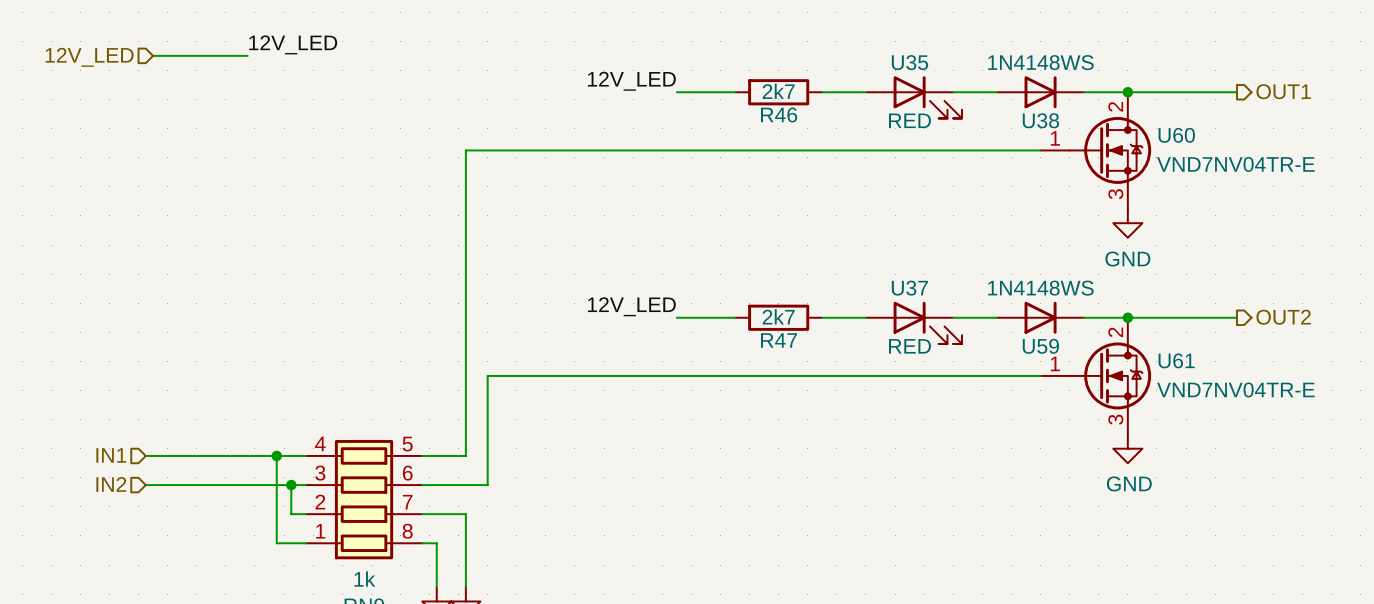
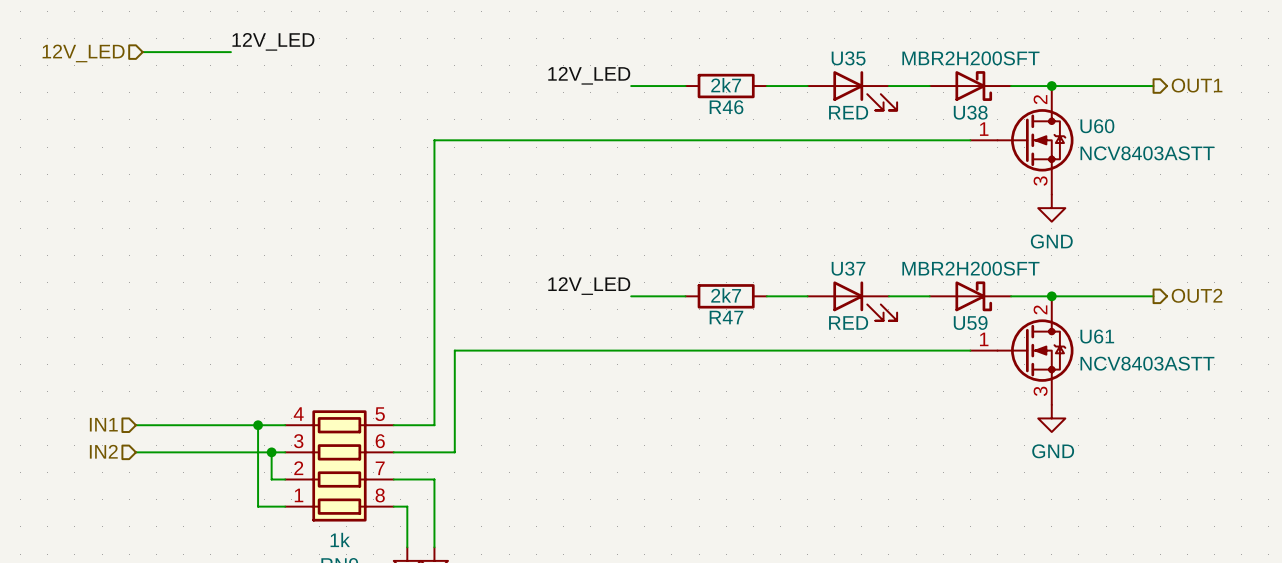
U38 value: 1N4148WS (1040, 62) -> MBR2H200SFT (970, 58)
U38 symbol: [996, 76, 1085, 109] -> [929, 71, 1012, 101]
U60 value: VND7NV04TR-E (1235, 164) -> NCV8403ASTT (1147, 153)
U59 value: 1N4148WS (1040, 288) -> MBR2H200SFT (970, 268)
U59 symbol: [996, 301, 1085, 334] -> [929, 281, 1012, 312]
U61 value: VND7NV04TR-E (1235, 389) -> NCV8403ASTT (1147, 363)

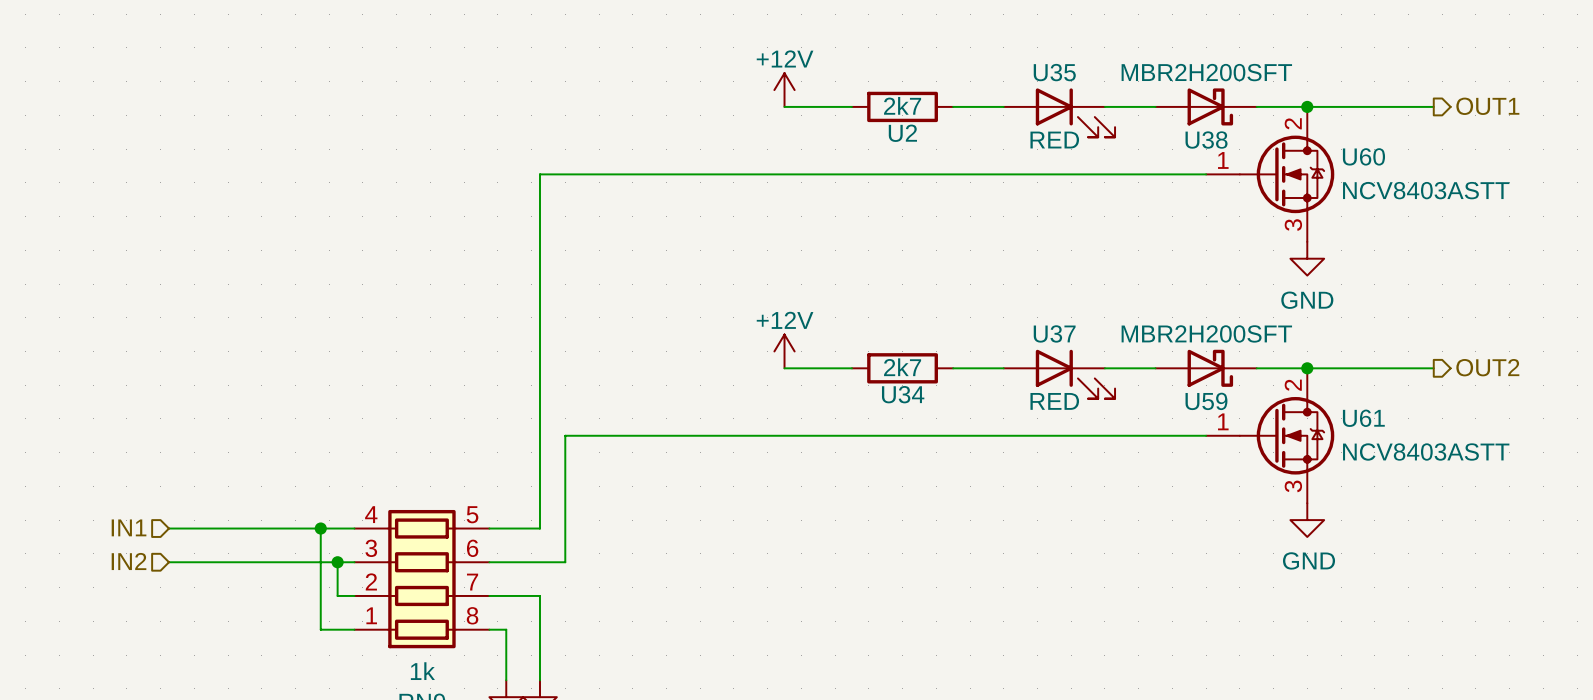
label: 12V_LED (273, 41) -> none
wire: (142, 52) (230, 52) -> none
hierarchical label: 12V_LED (83, 53) -> none
power symbol: none -> +12V (784, 90)
label: 12V_LED (589, 75) -> none
R46 name: R46 (726, 107) -> U2 (902, 133)
power symbol: none -> +12V (784, 351)
label: 12V_LED (589, 286) -> none
R47 name: R47 (726, 317) -> U34 (903, 394)

